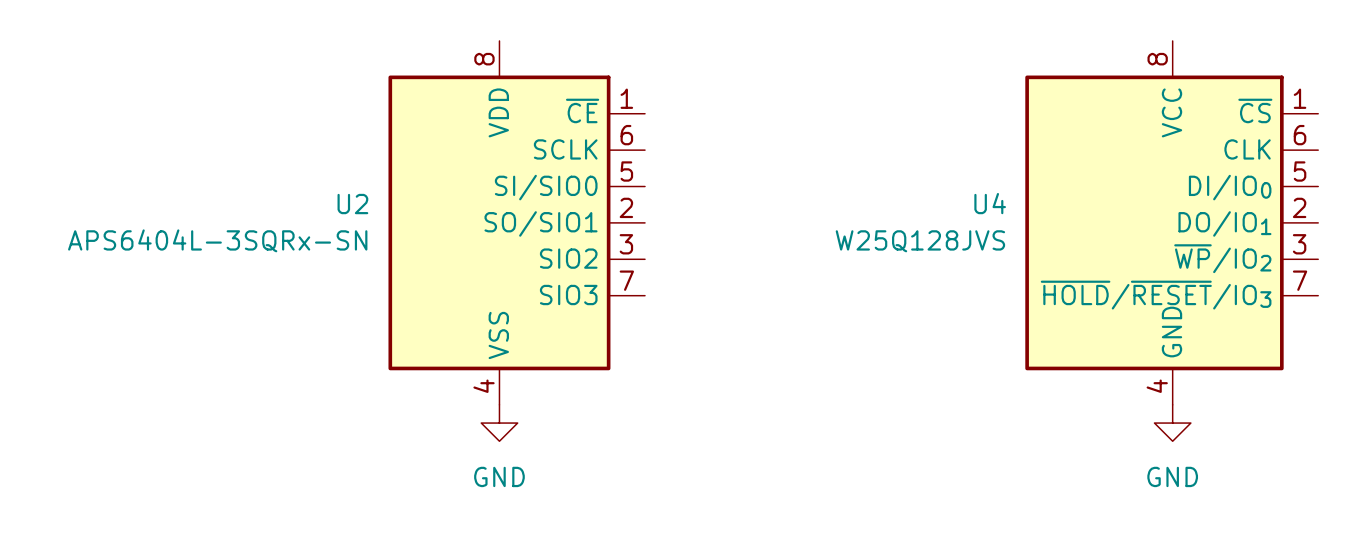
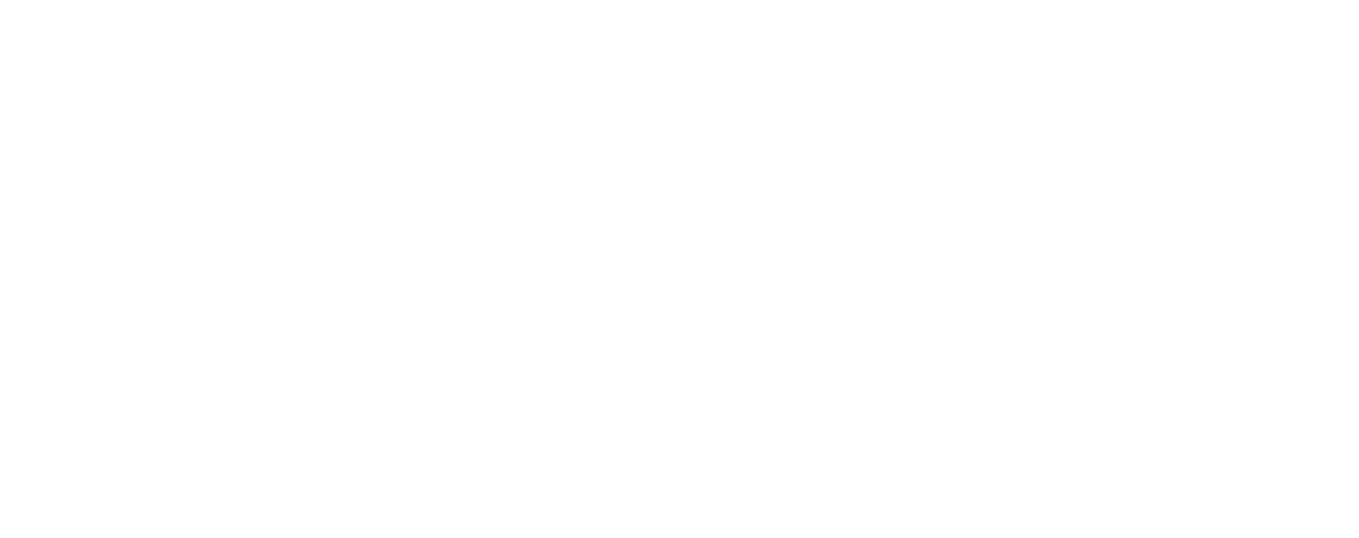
U2: APS6404L-3SQRx-SN (516, 222) -> none
U4: W25Q128JVS (1171, 222) -> none
power symbol: GND (499, 423) -> none
power symbol: GND (1172, 423) -> none

